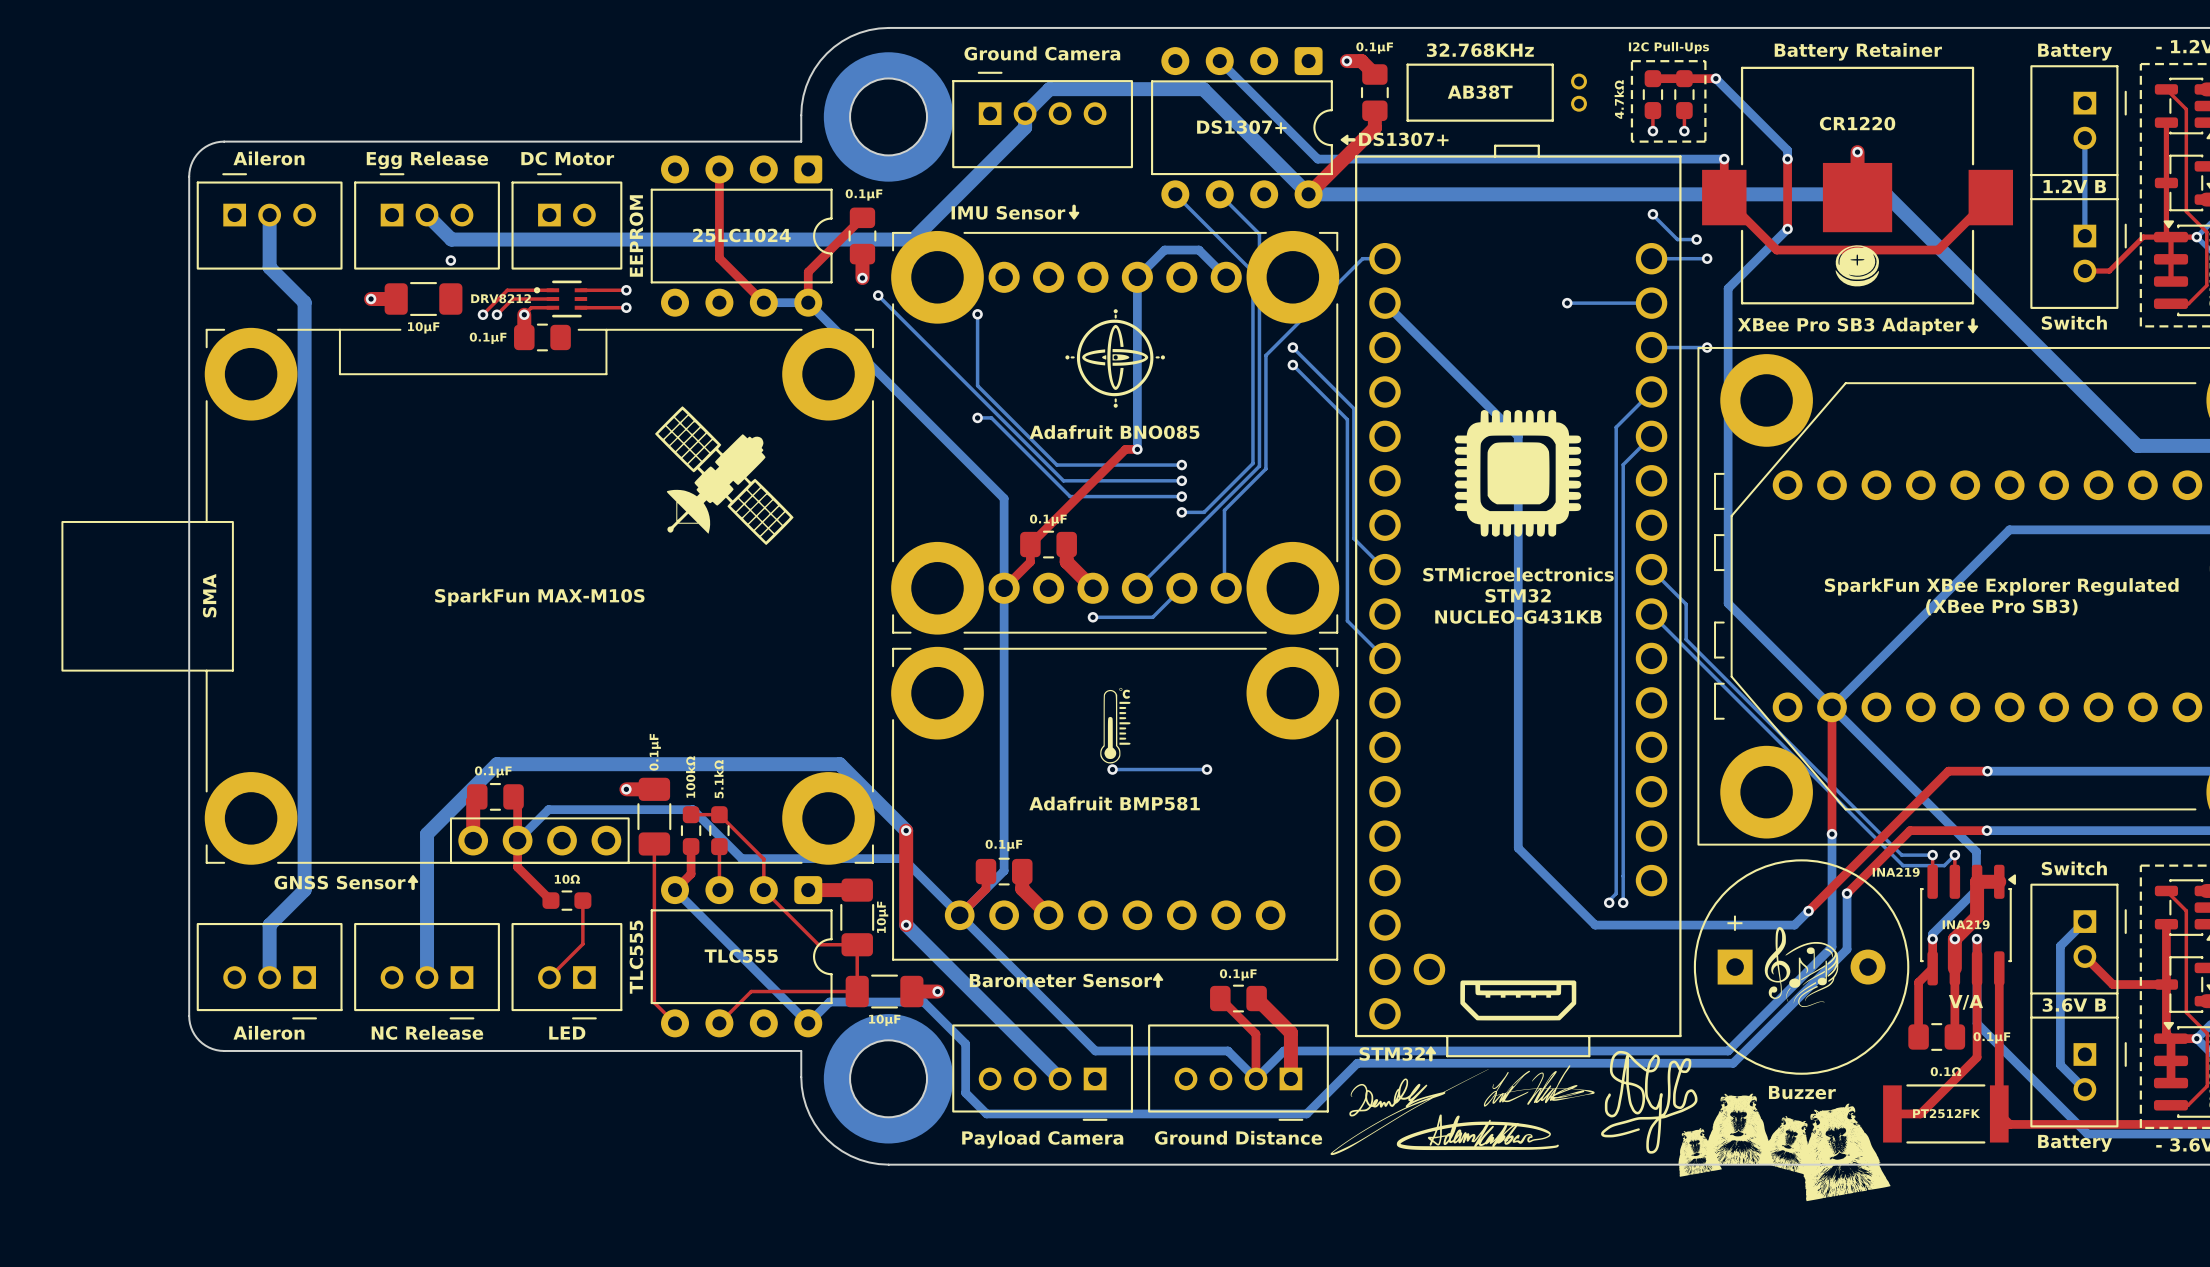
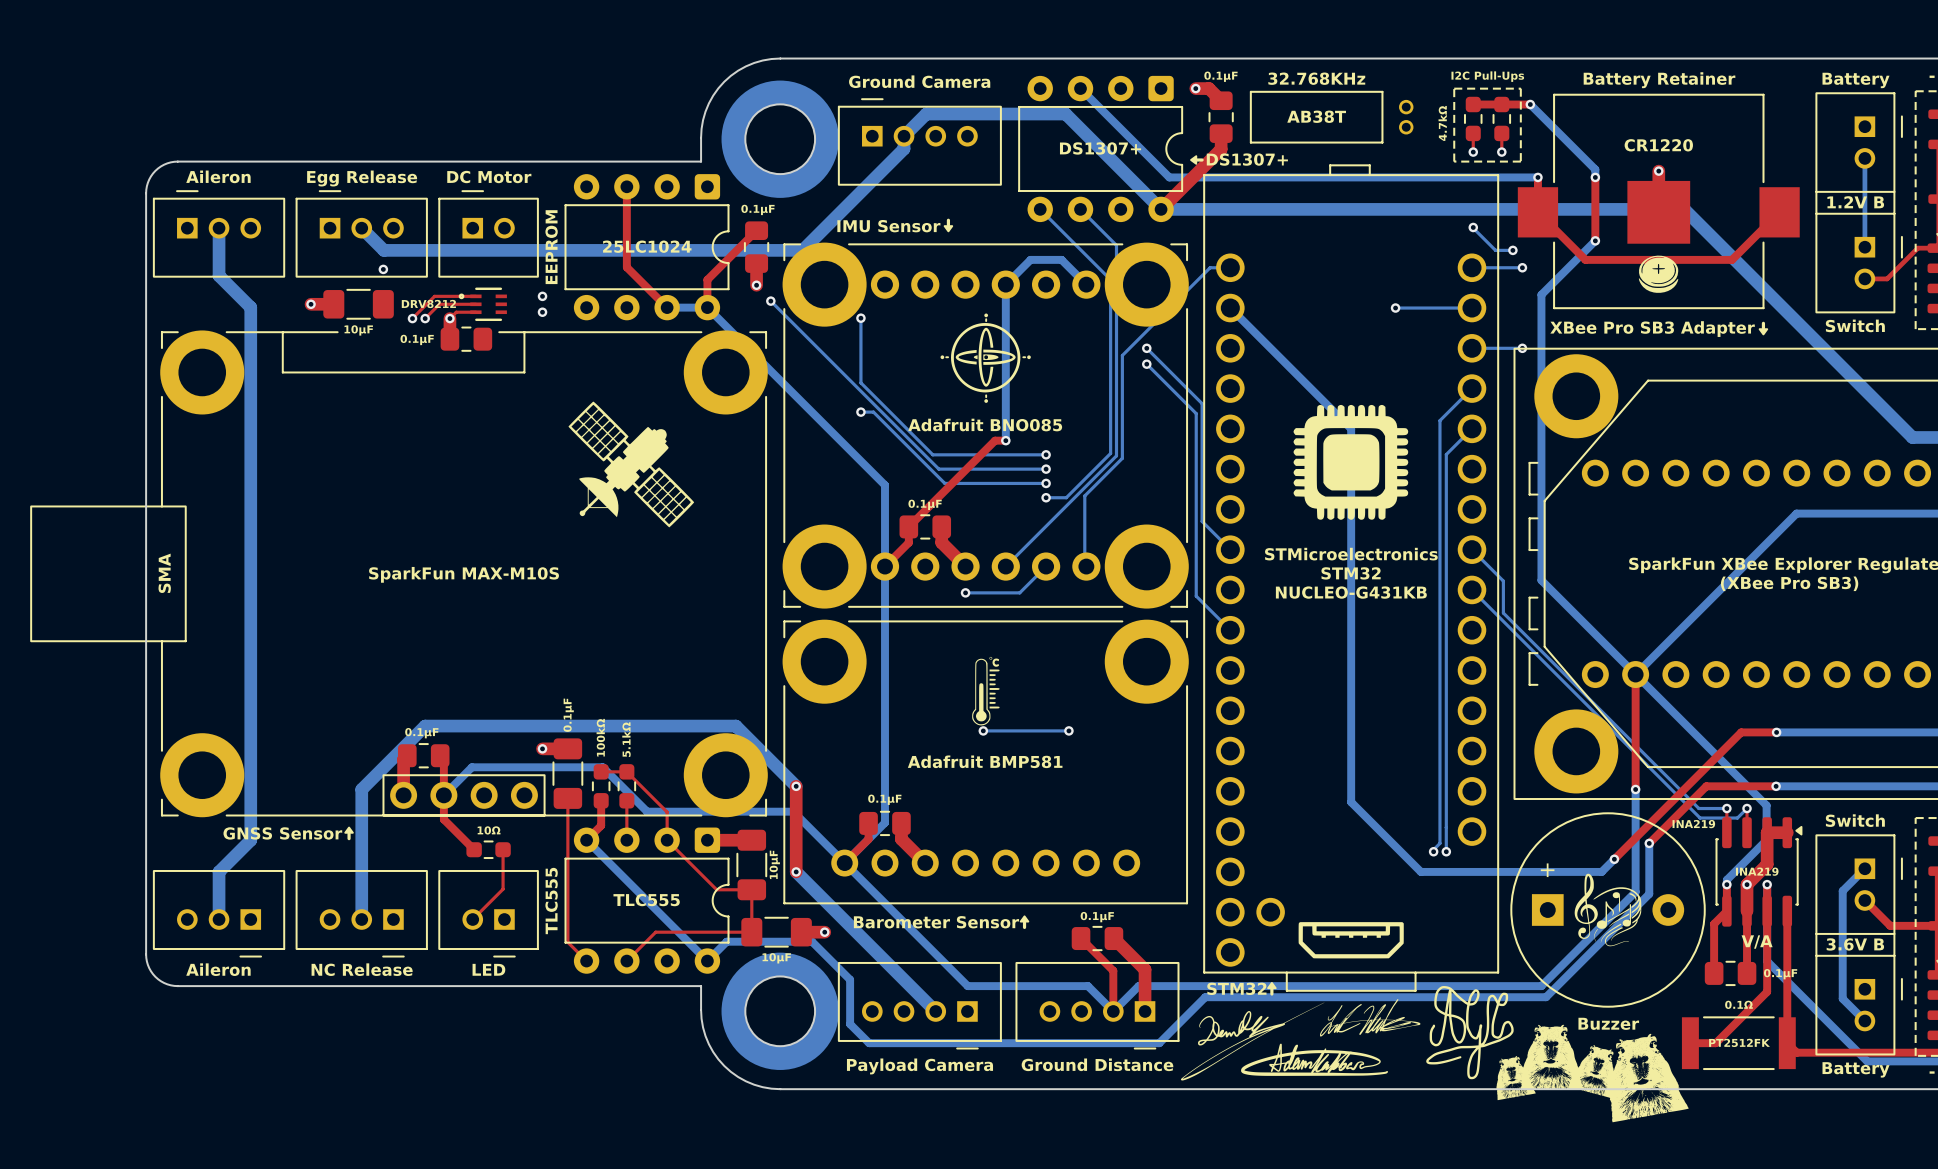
top track: (580, 290) (626, 290) -> none
top track: (580, 307) (626, 307) -> none

